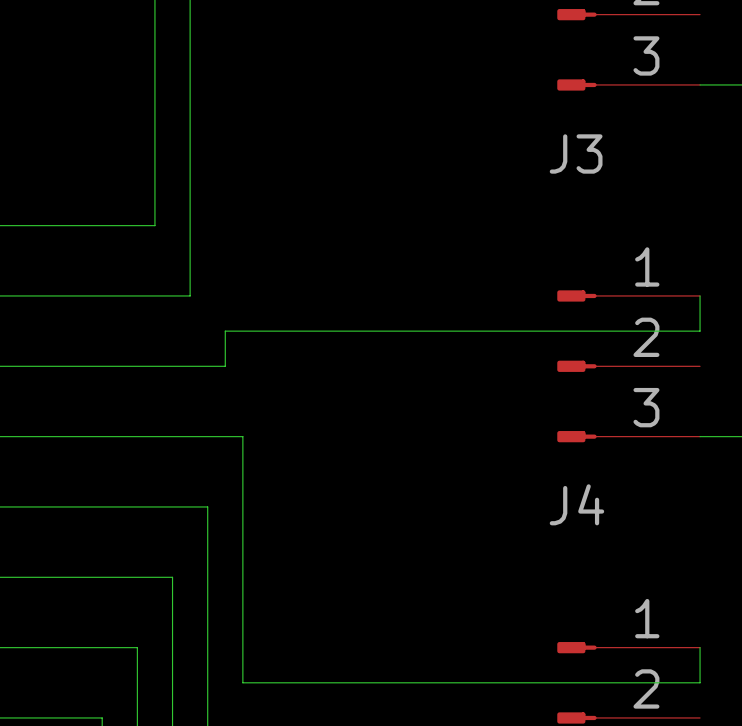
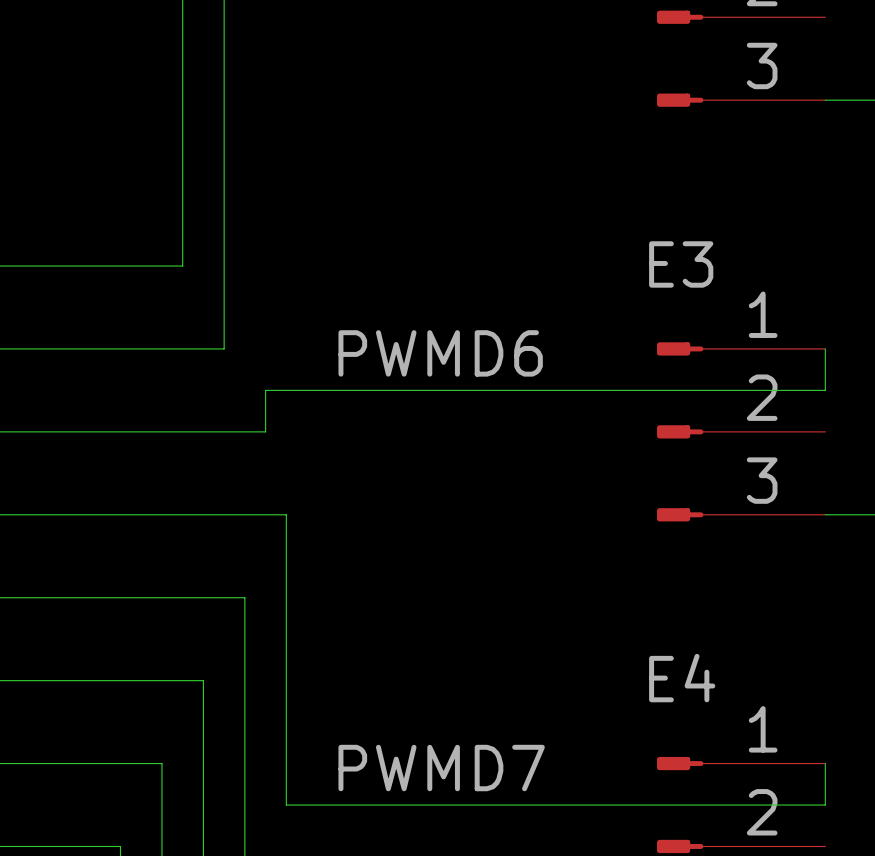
J3 name: J3 (576, 153) -> E3 (681, 264)
label: none -> PWMD6 (440, 353)
J4 name: J4 (576, 504) -> E4 (682, 678)
label: none -> PWMD7 (441, 768)

